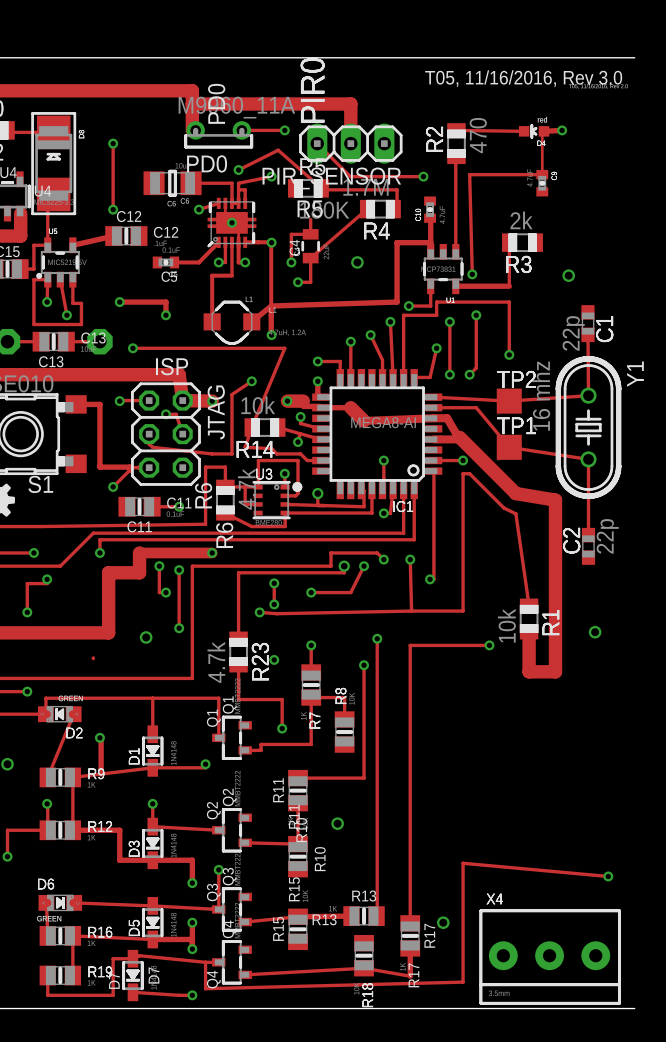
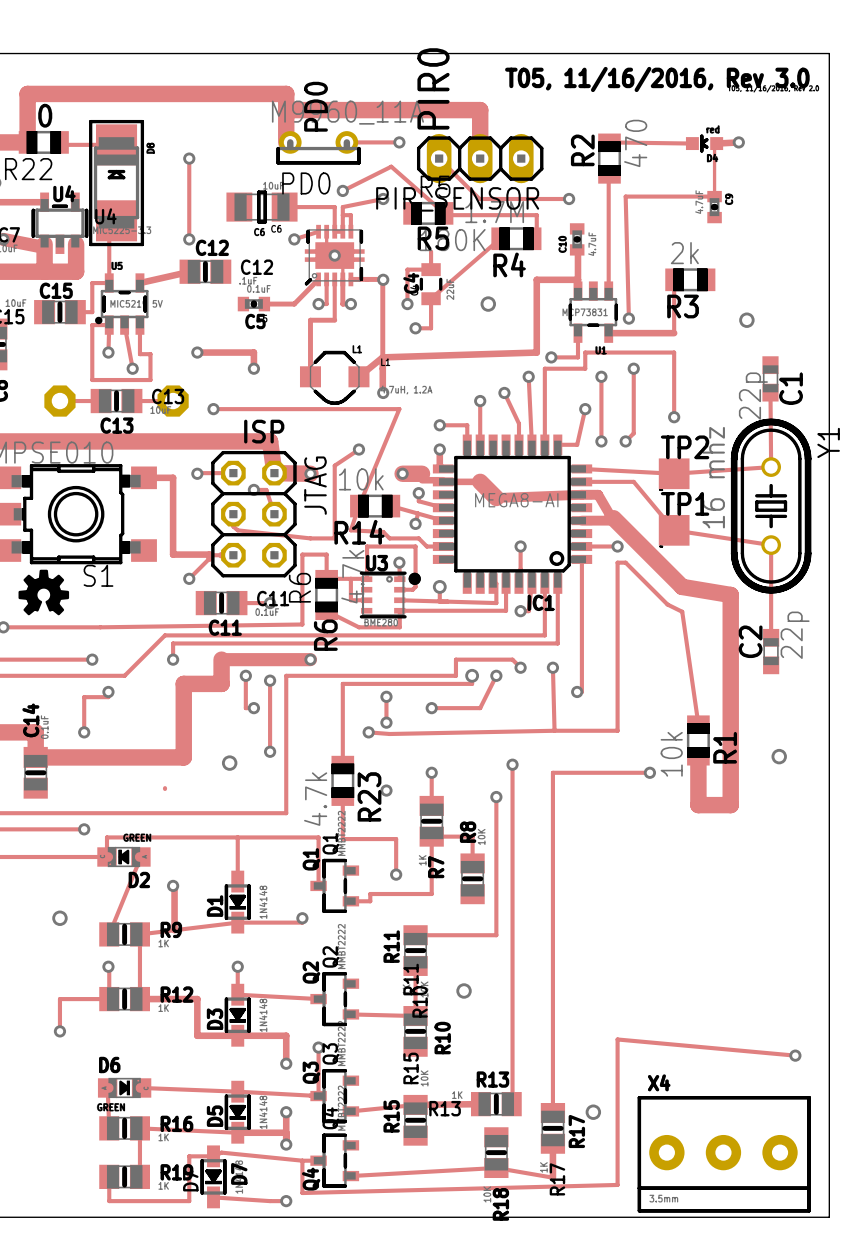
board edge: none -> (827, 53) (829, 53) (829, 1217) (827, 1217)

